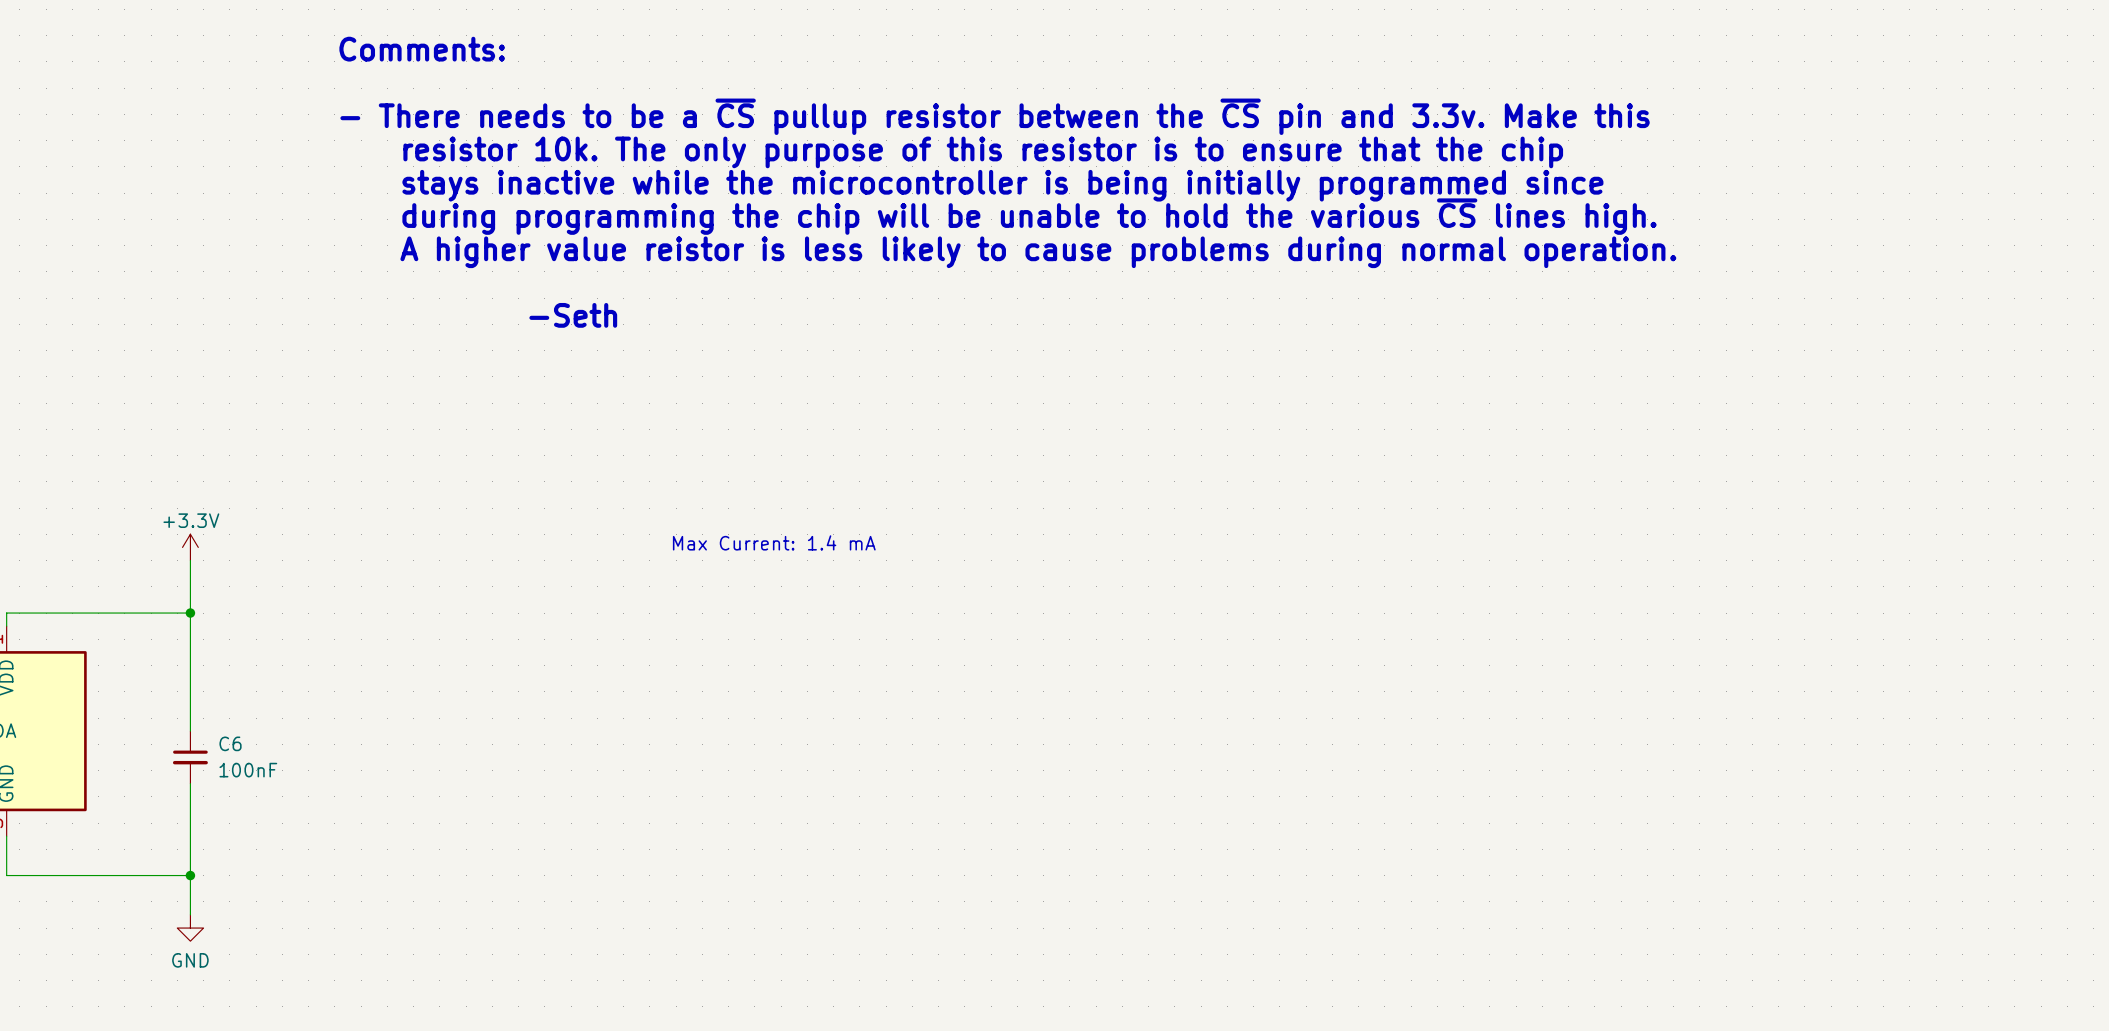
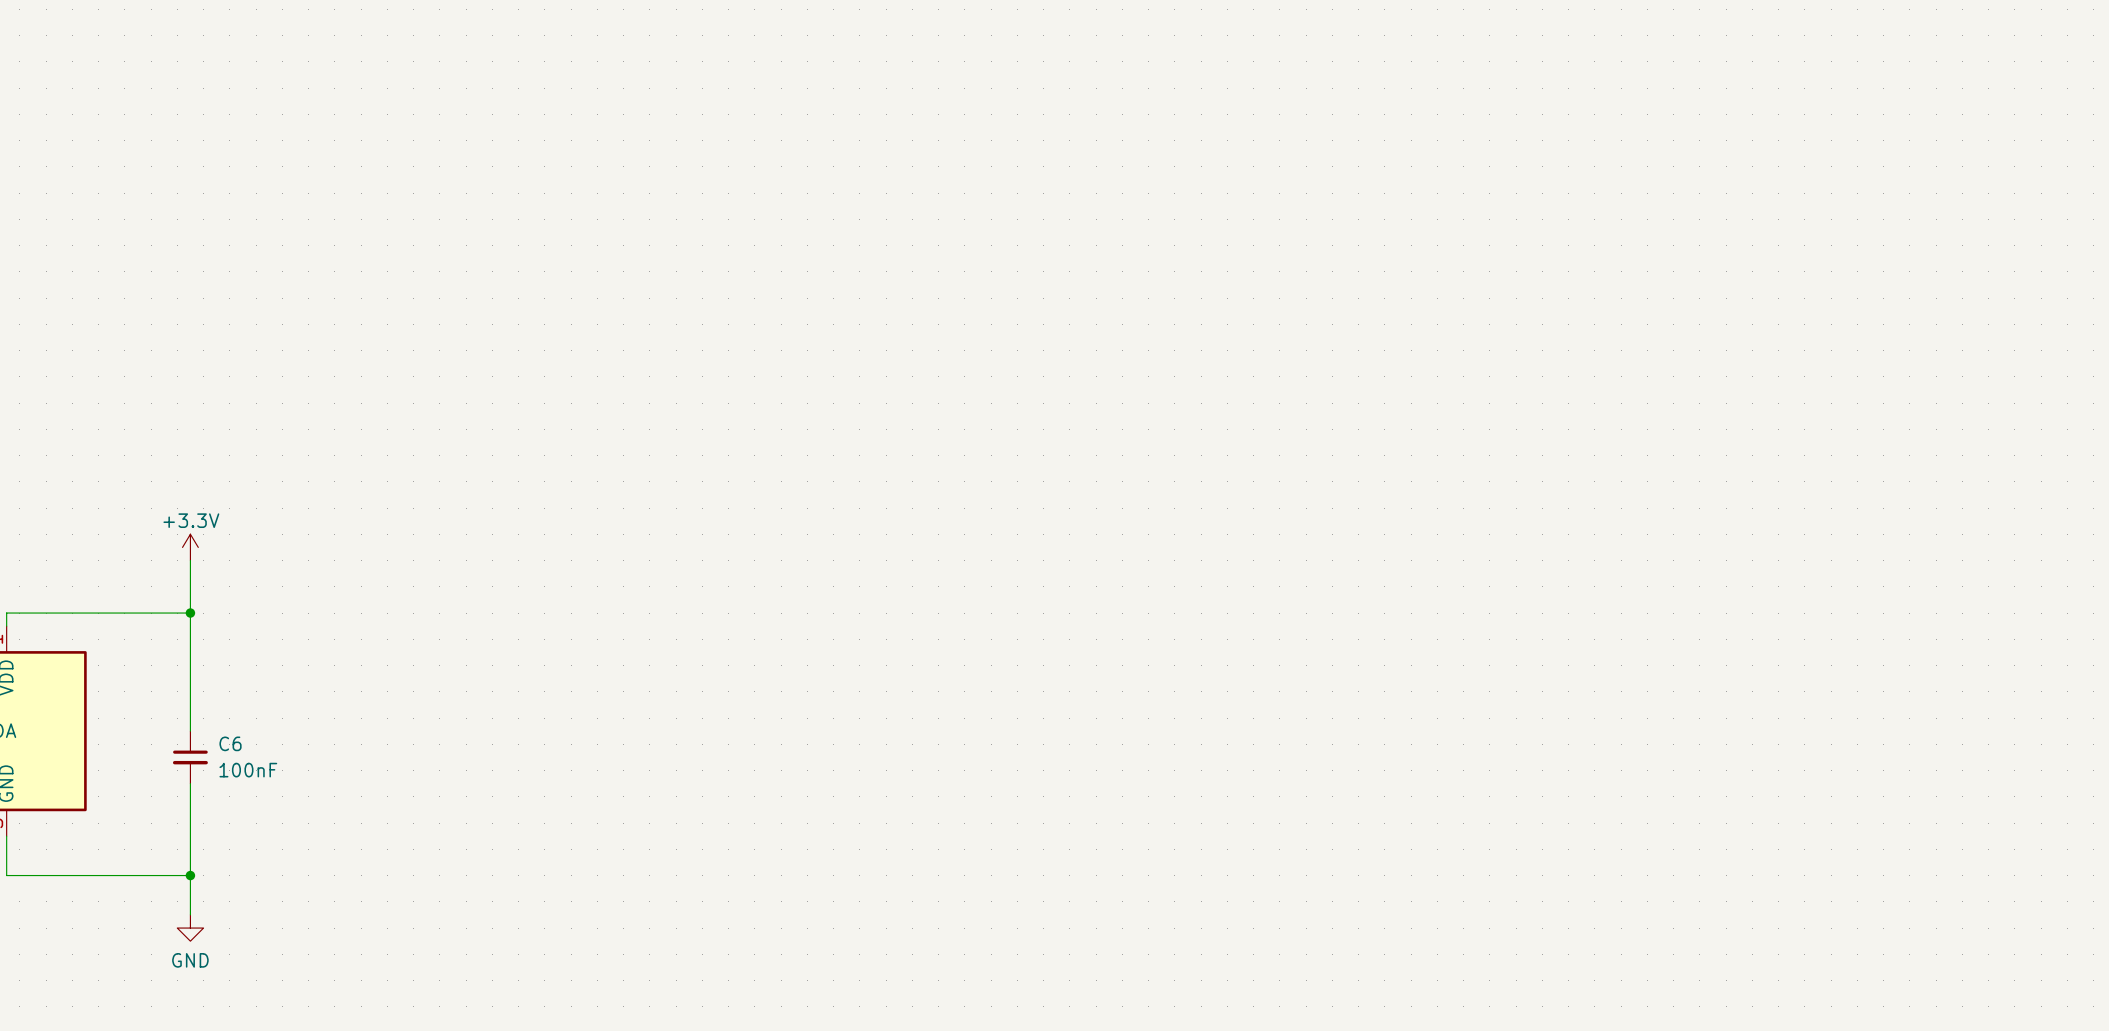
text: Comments: (422, 49) -> none
text: - There needs to be a ~{CS} pullup resistor between the ~{CS} pin and 3.3v. Make this (995, 116) -> none
text: resistor 10k. The only purpose of this resistor is to ensure that the chip (983, 152) -> none
text: stays inactive while the microcontroller is being initially programmed since (1002, 185) -> none
text: during programming the chip will be unable to hold the various ~{CS} lines high. (1029, 216) -> none
text: A higher value reistor is less likely to cause problems during normal operation. (1038, 252) -> none
text: -Seth (573, 315) -> none
text: Max Current: 1.4 mA (774, 542) -> none

